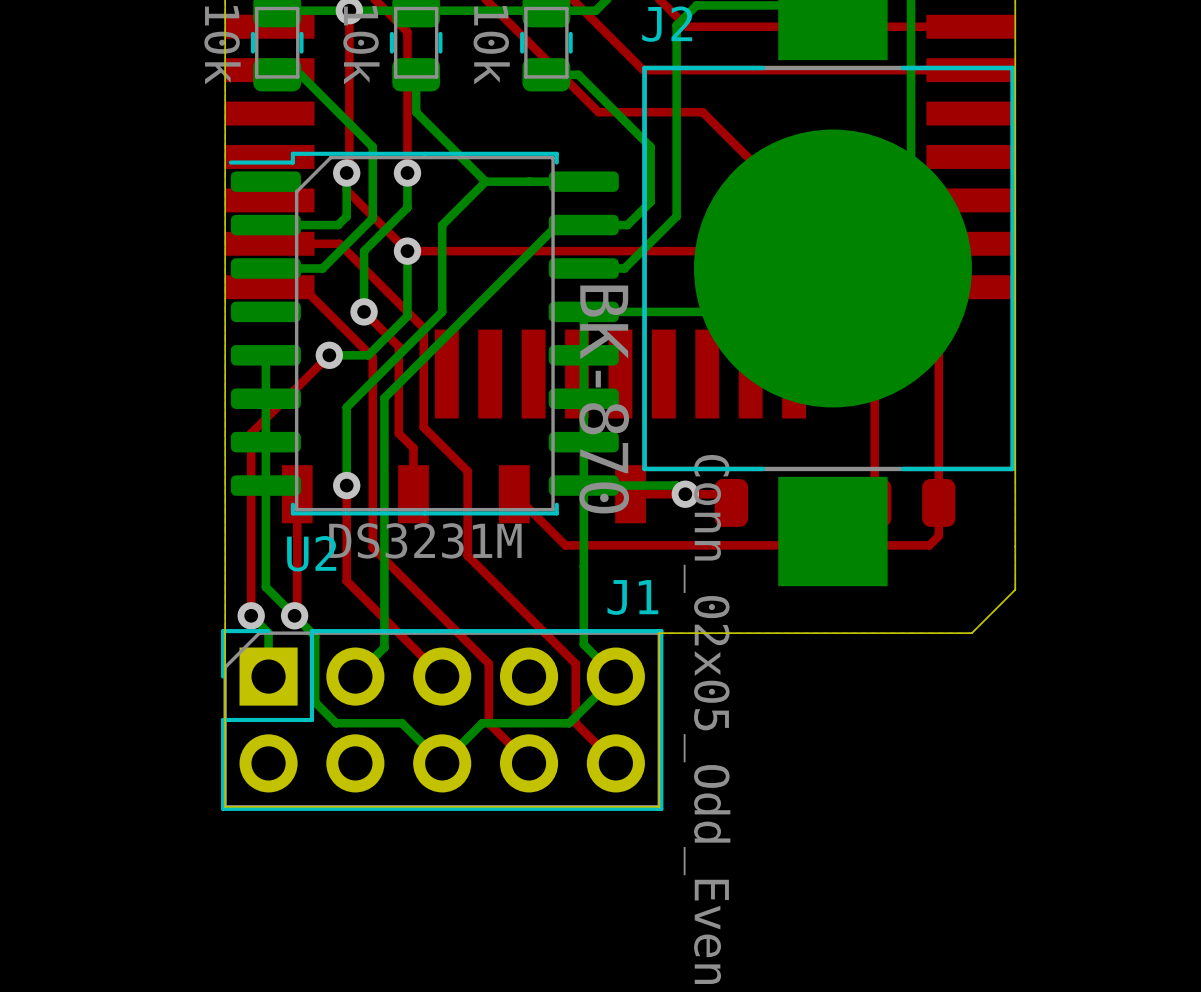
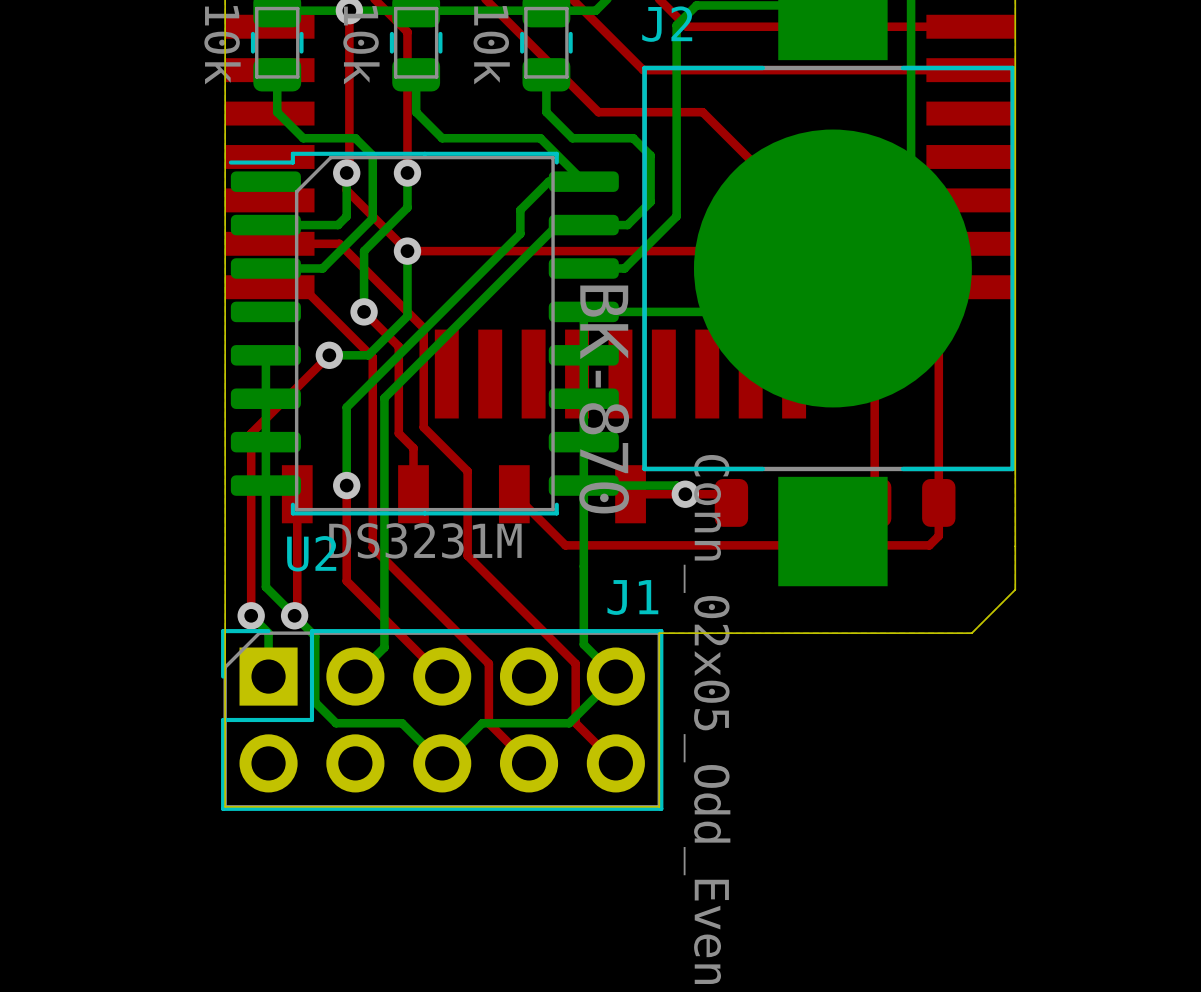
bottom track: (277, 74) (300, 74) (372, 146) (372, 155) -> (277, 74) (277, 112) (303, 138) (355, 138) (372, 155)
bottom track: (546, 74) (578, 74) (650, 146) (650, 155) -> (546, 74) (546, 112) (572, 138) (633, 138) (650, 155)
bottom track: (442, 138) (485, 181) -> (442, 138) (540, 138) (583, 181)
bottom track: (485, 181) (442, 225) (442, 311) -> (548, 181) (520, 210) (520, 233) (442, 311)
bottom track: (548, 181) (485, 181) -> none

